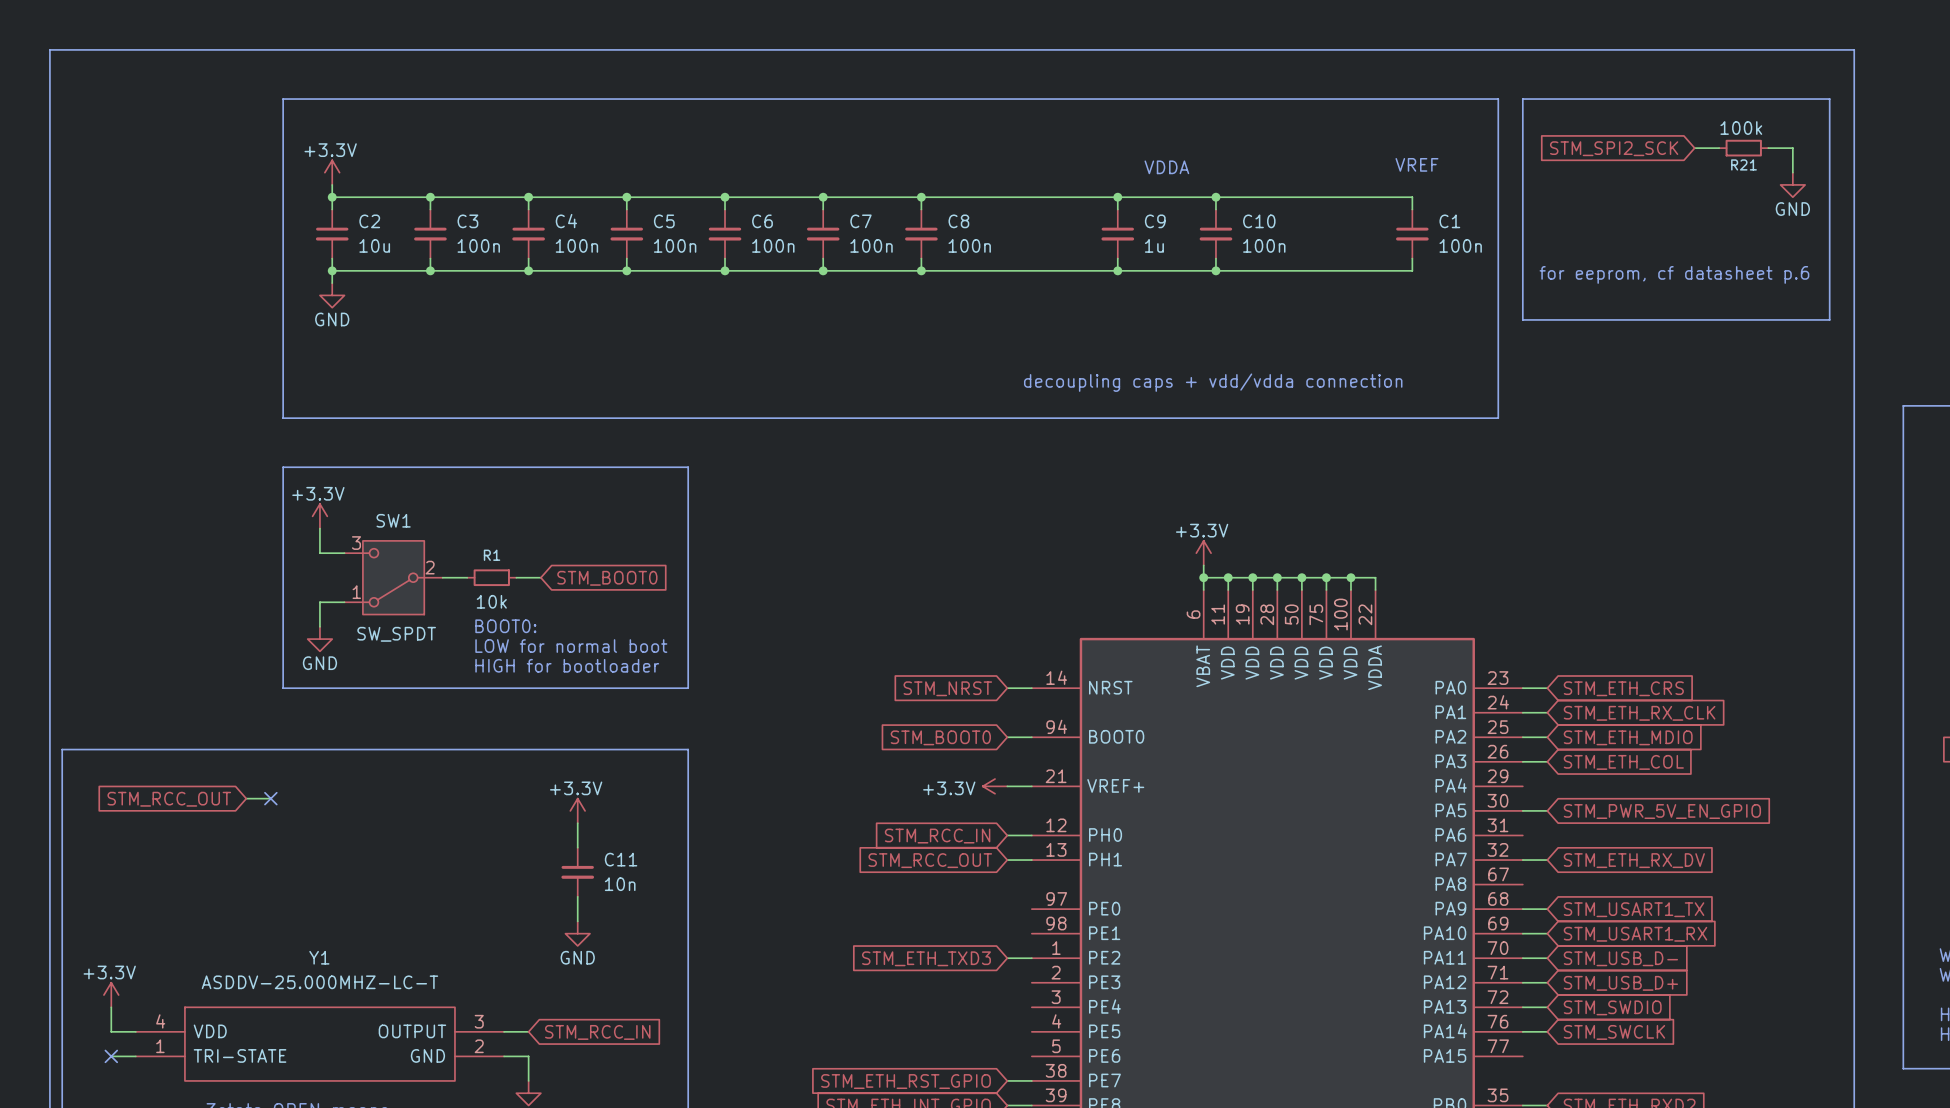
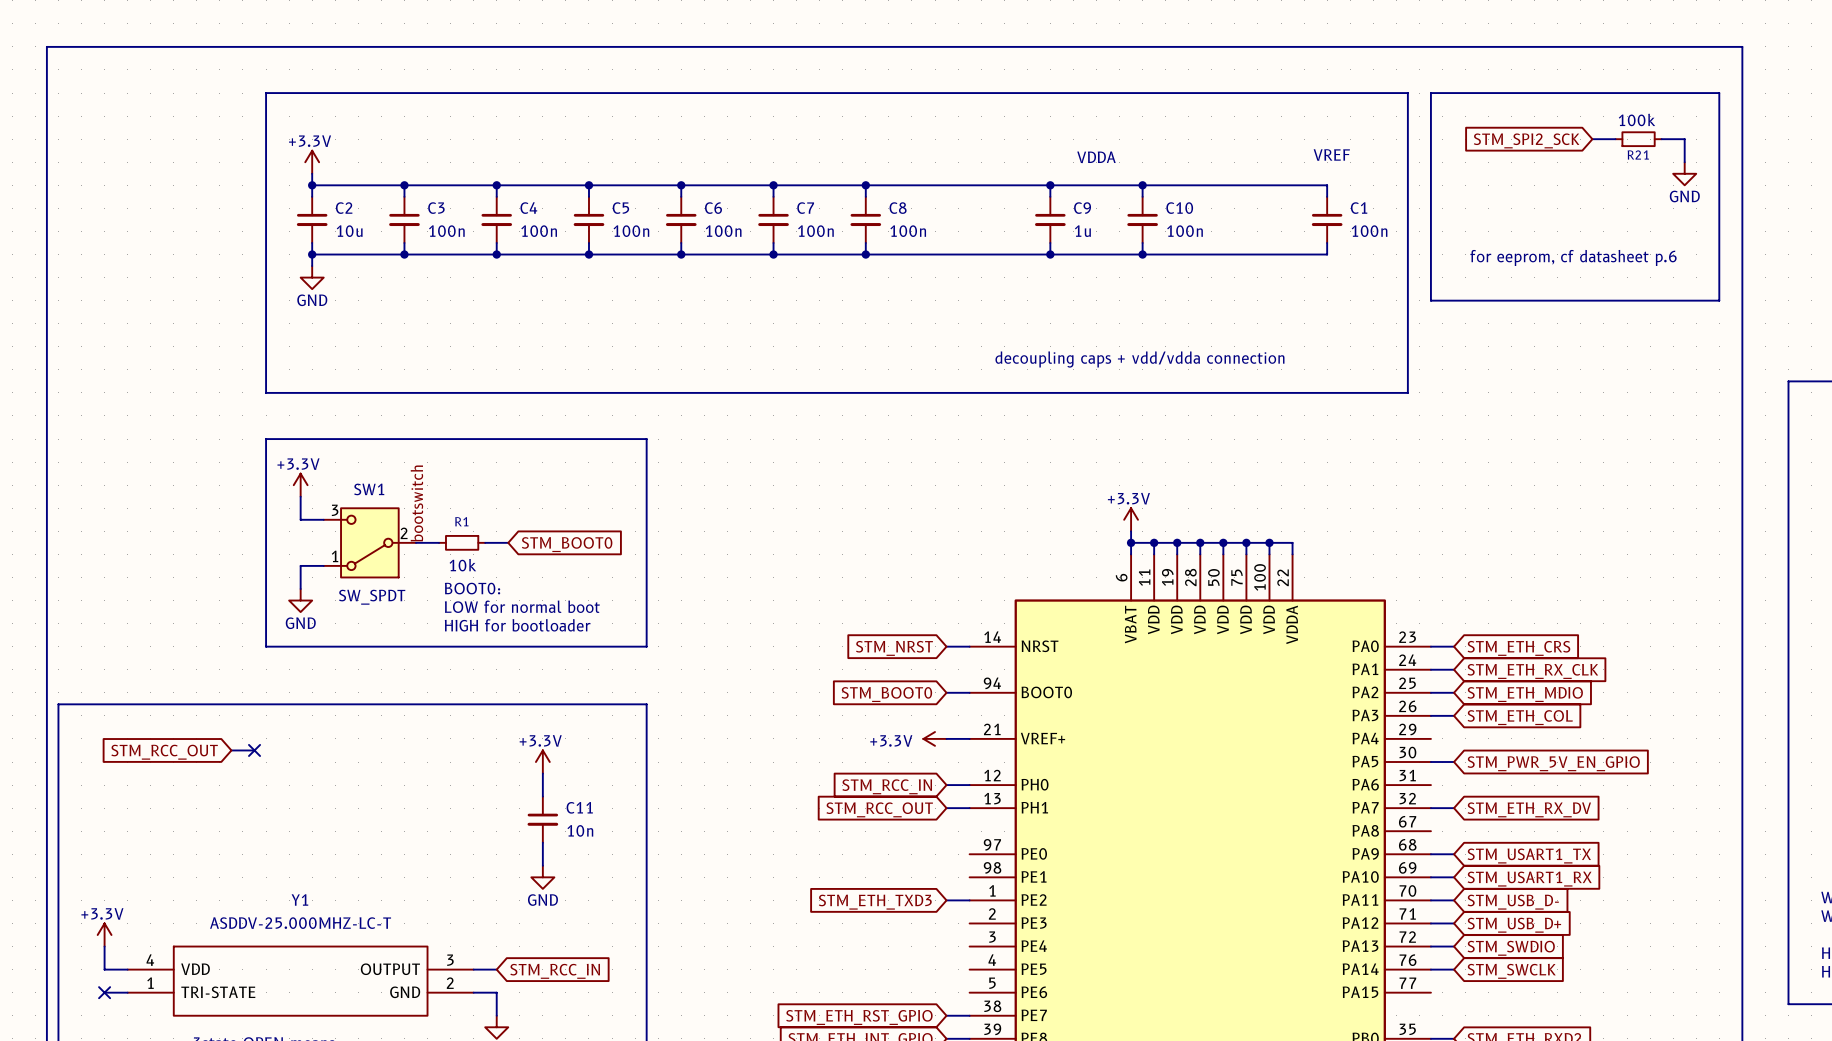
label: none -> bootswitch (416, 503)

